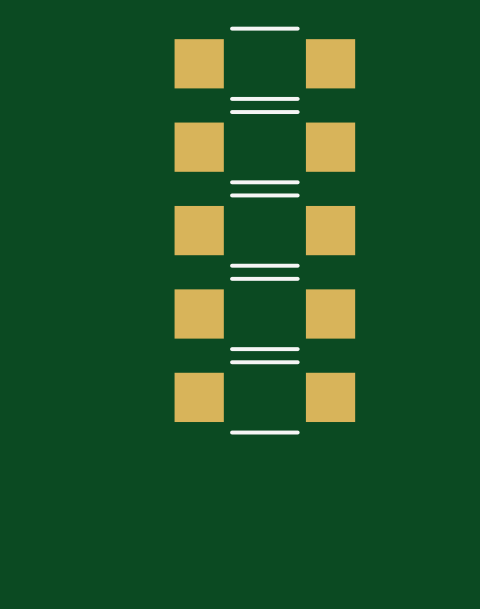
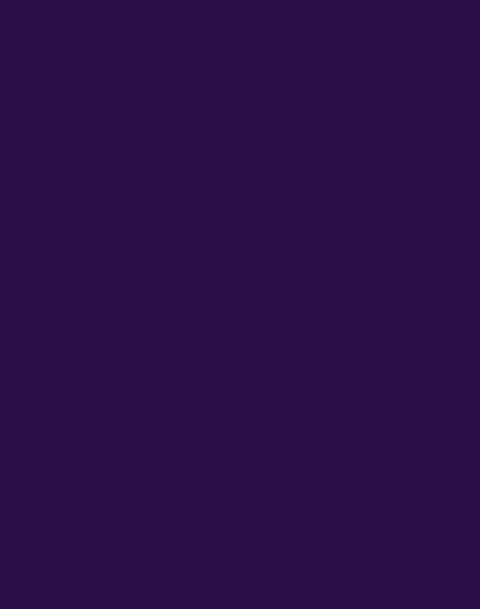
part: (264, 63) -> none
part: (264, 147) -> none
part: (264, 230) -> none
part: (264, 313) -> none
part: (264, 397) -> none

